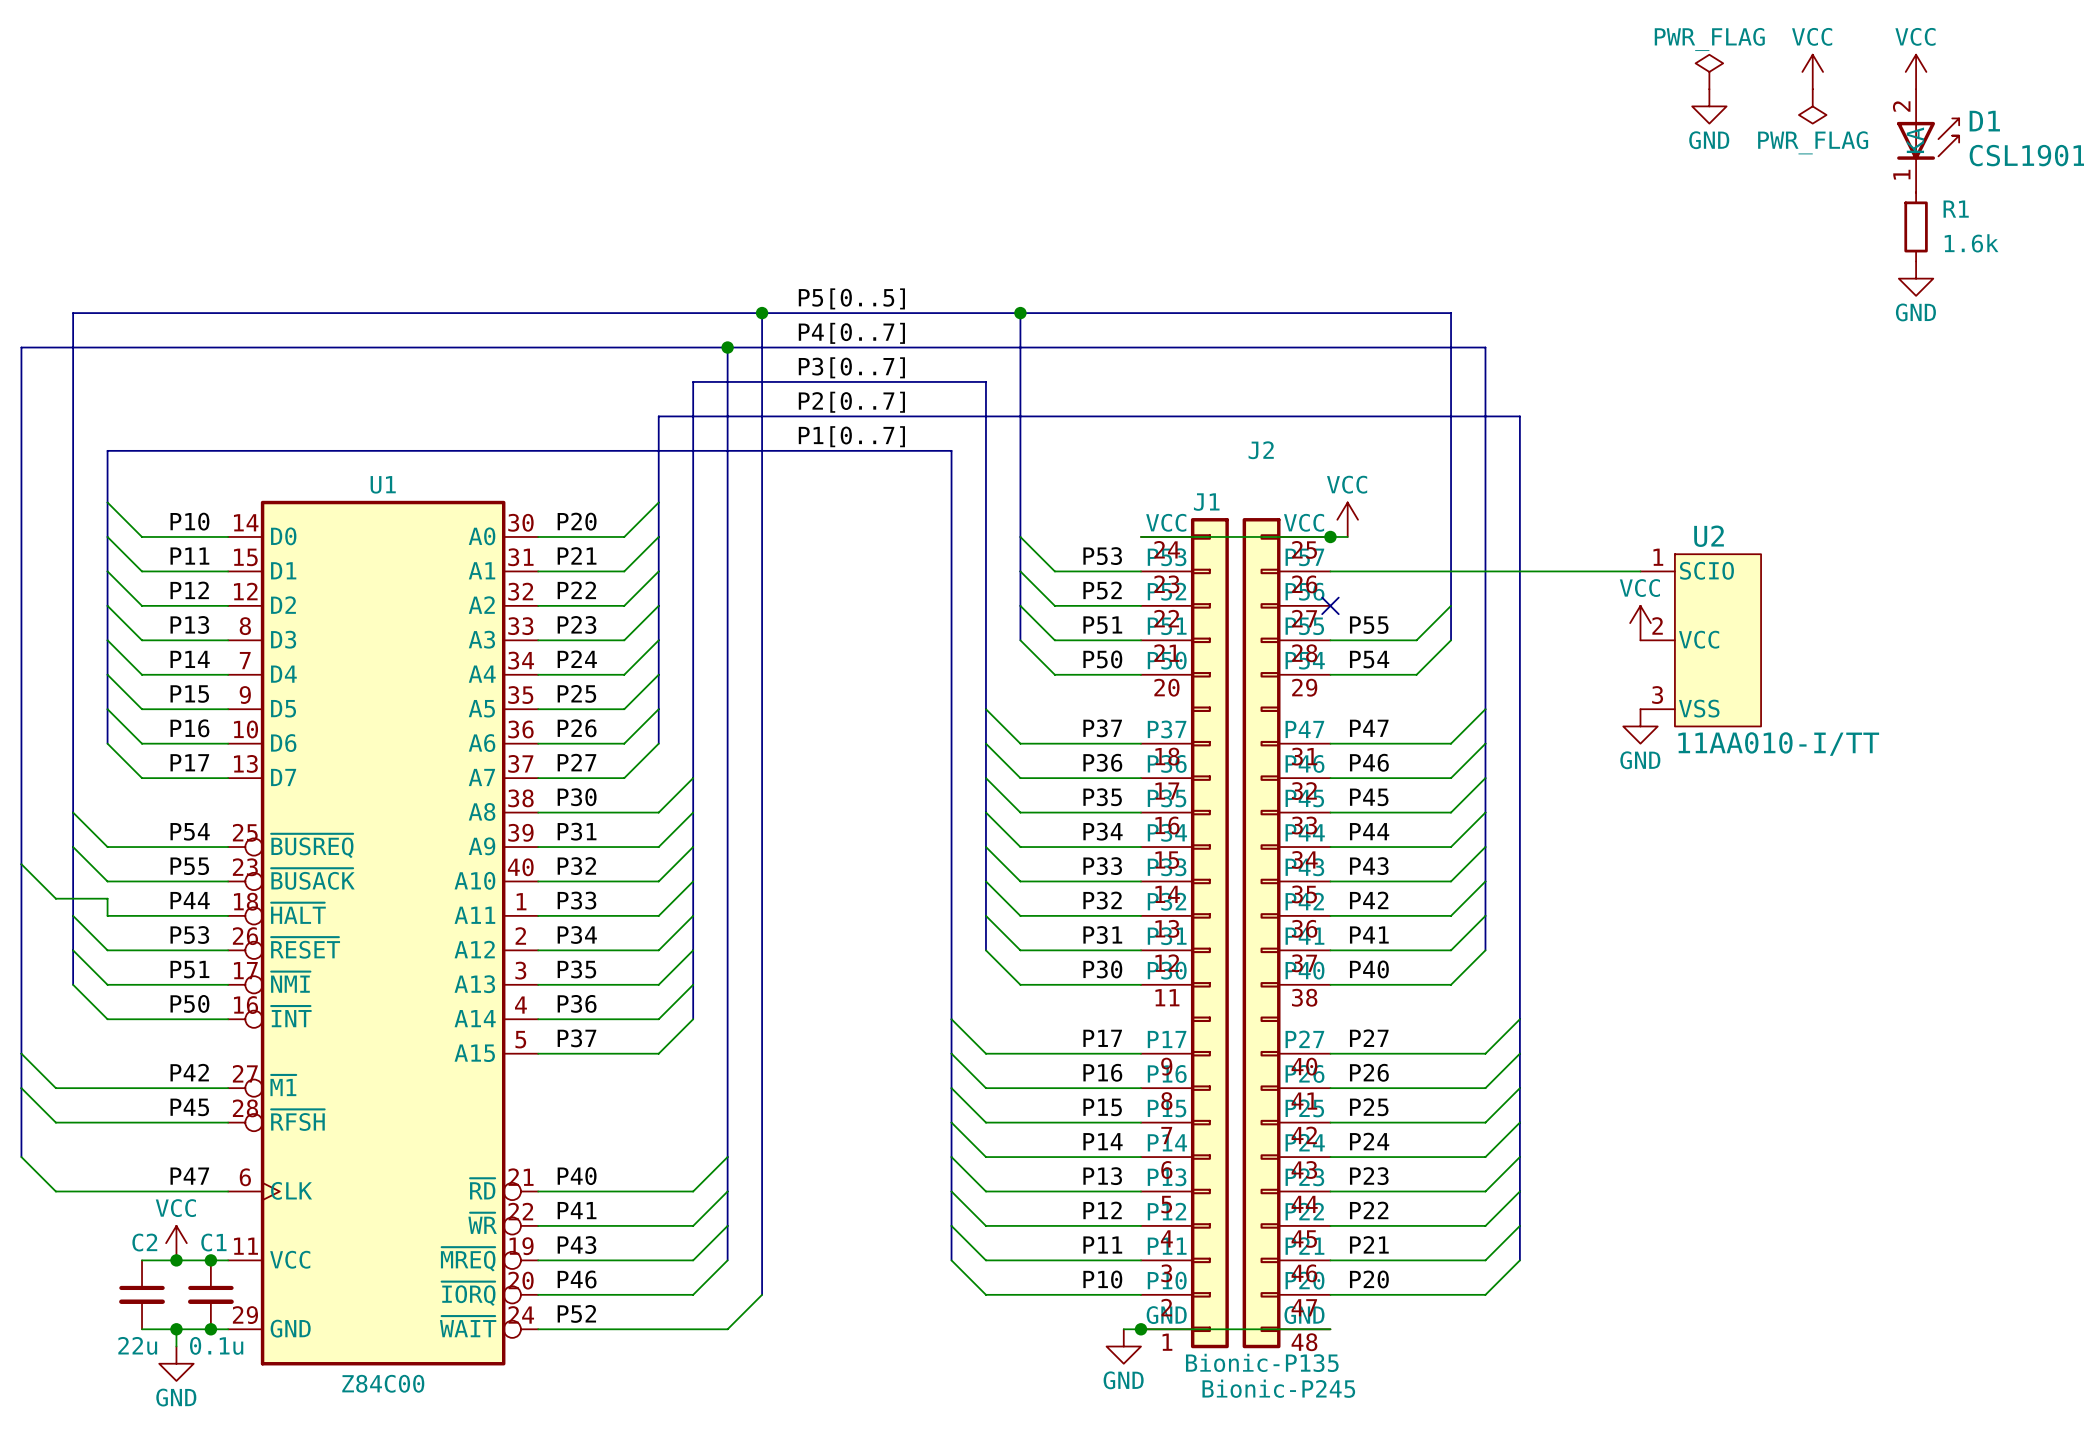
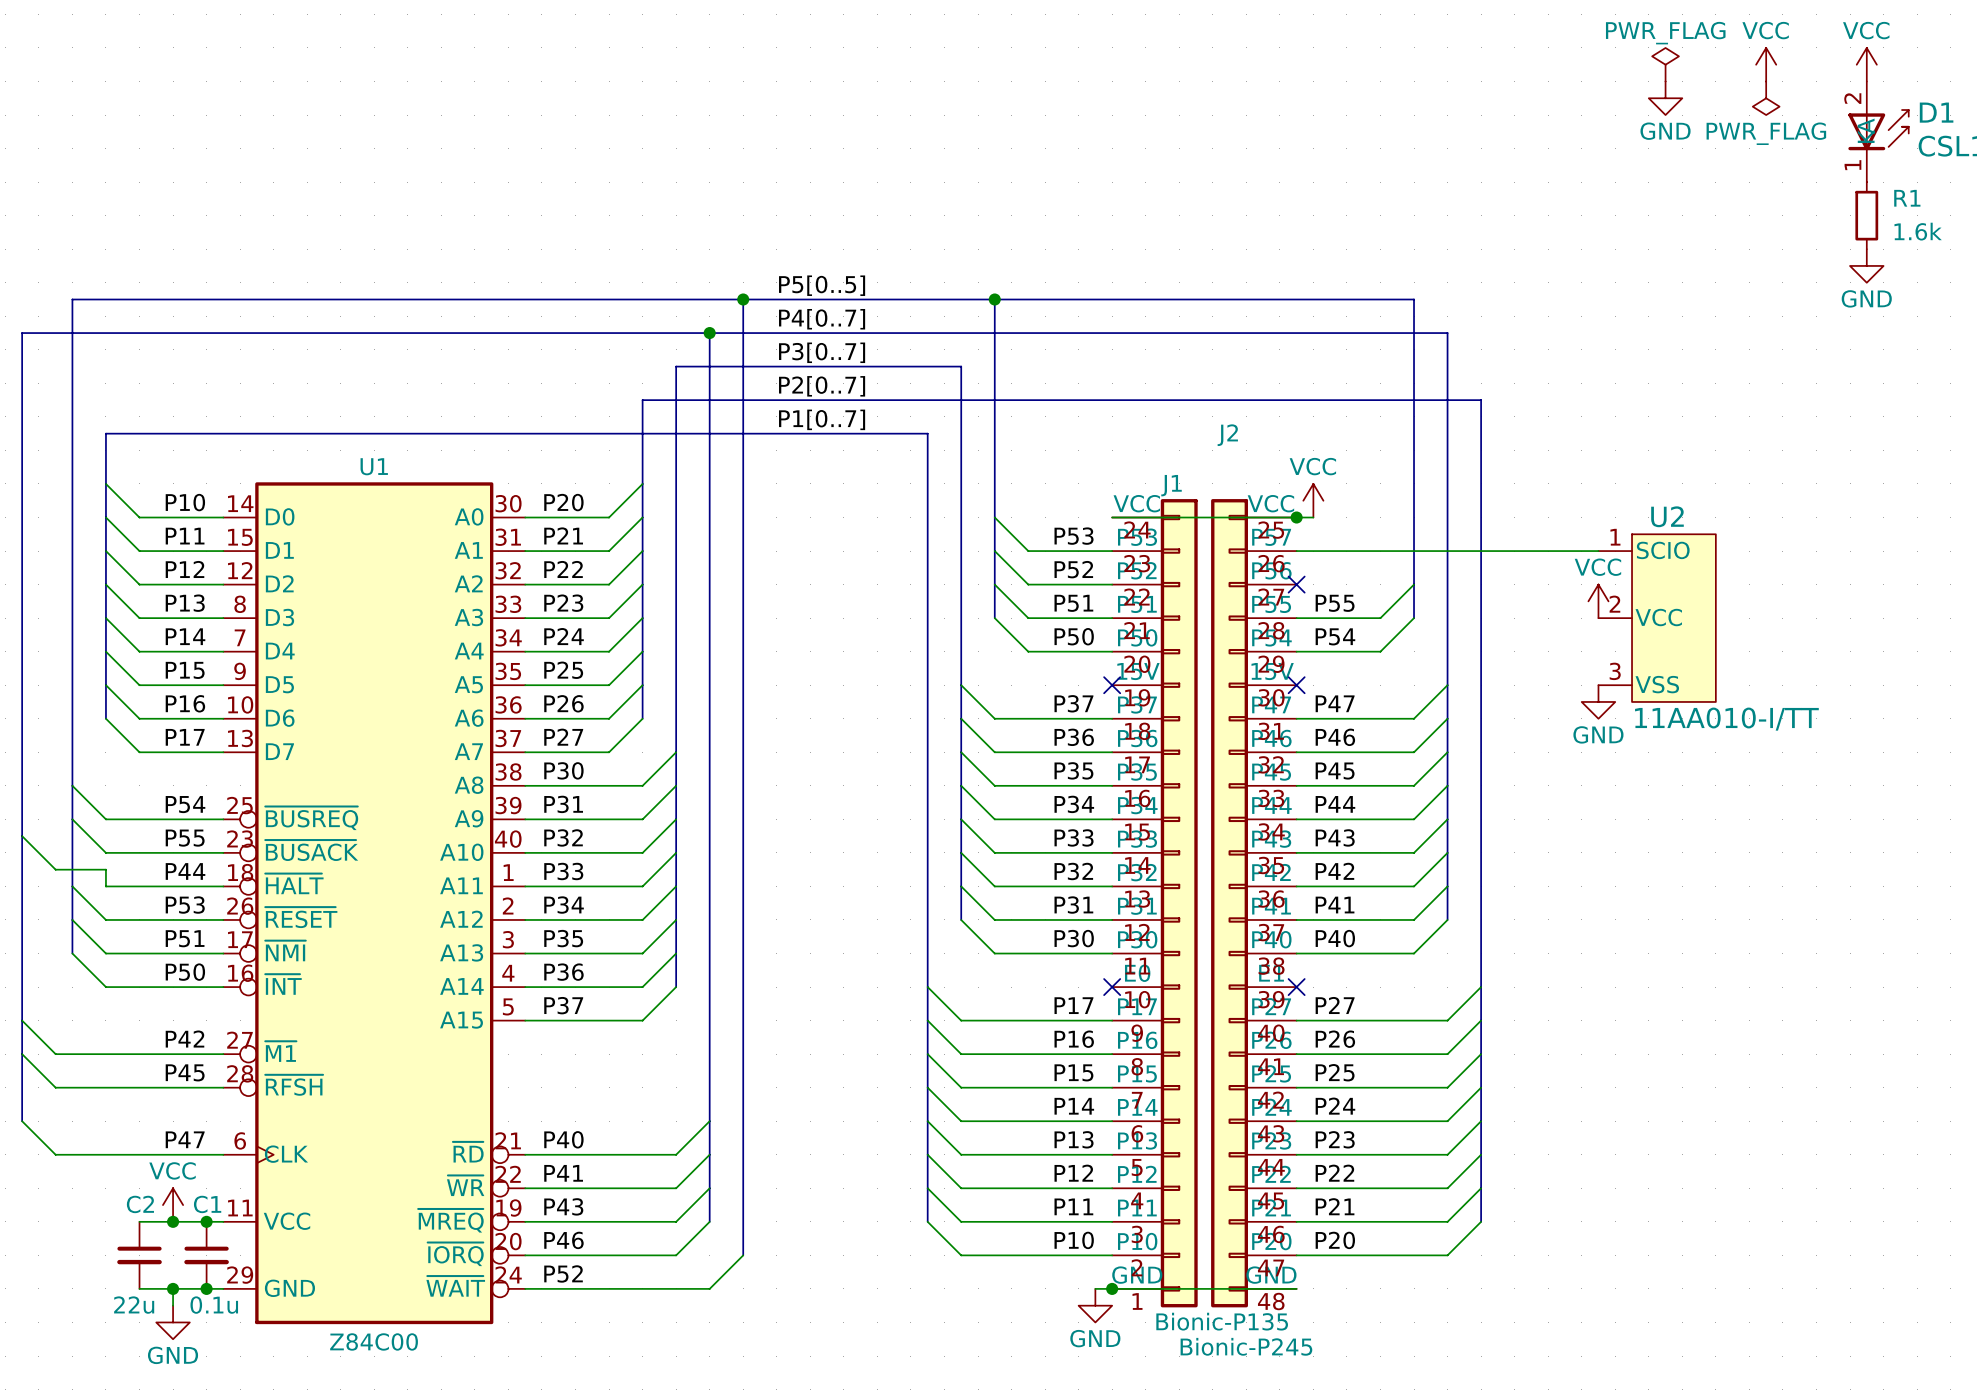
J1 symbol: [1141, 518, 1229, 1349] -> [1112, 499, 1198, 1308]
J2 symbol: [1242, 518, 1331, 1349] -> [1211, 499, 1297, 1308]
no-connect mark: none -> (1112, 685)
no-connect mark: none -> (1296, 685)
no-connect mark: none -> (1112, 987)
no-connect mark: none -> (1296, 987)

